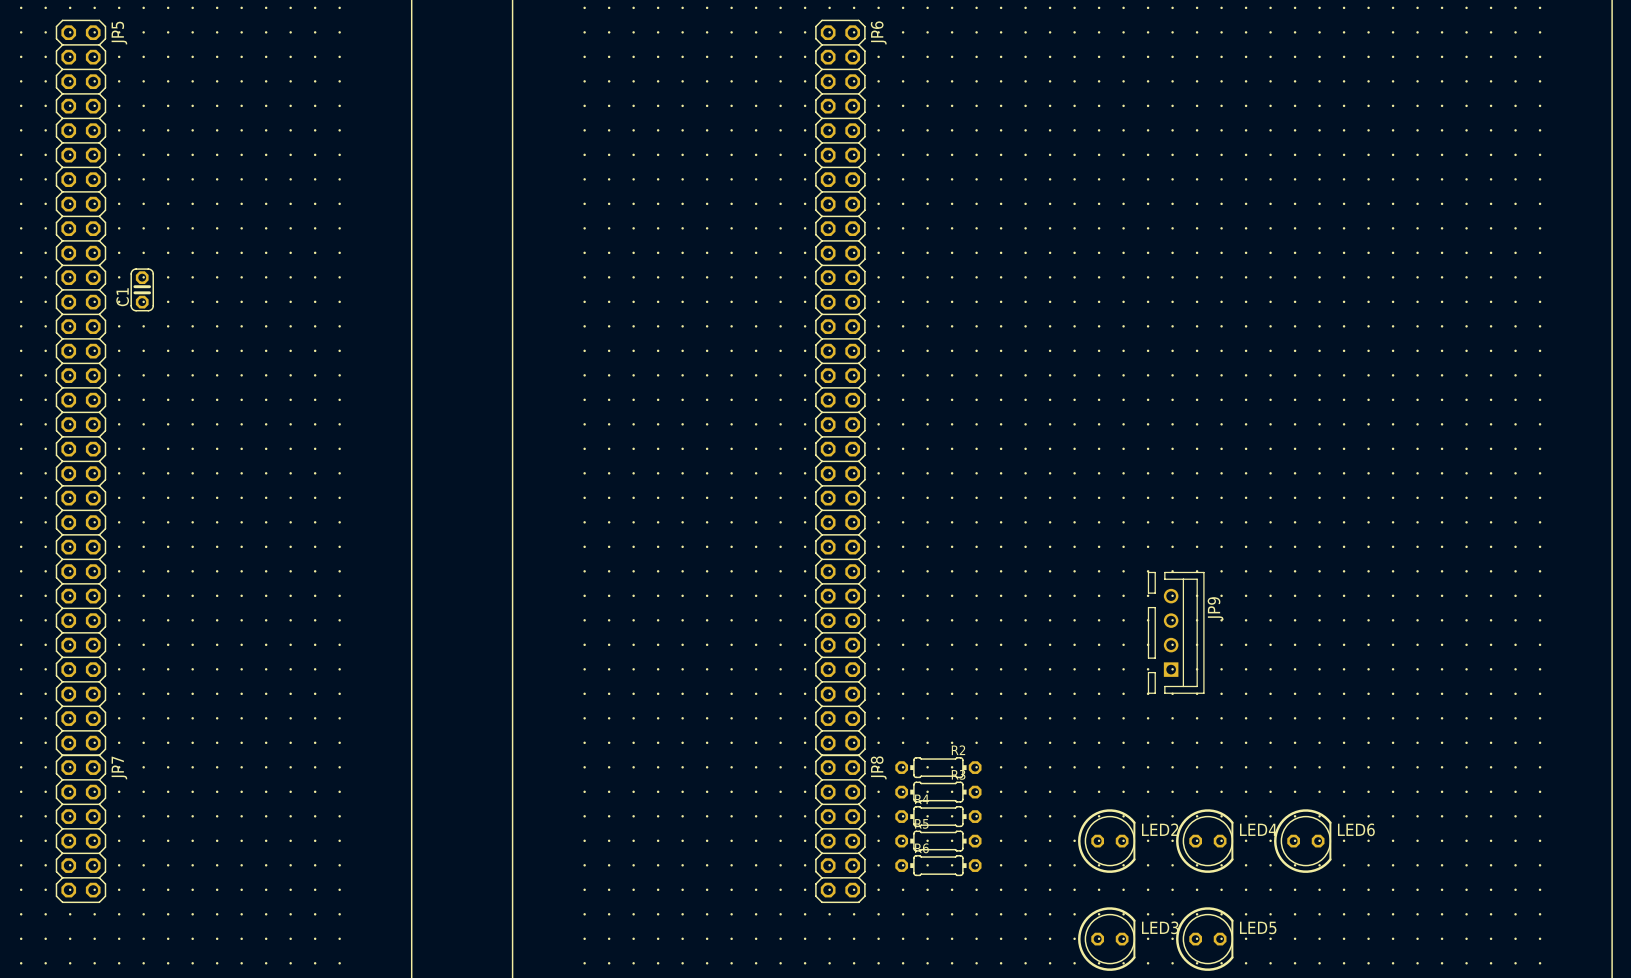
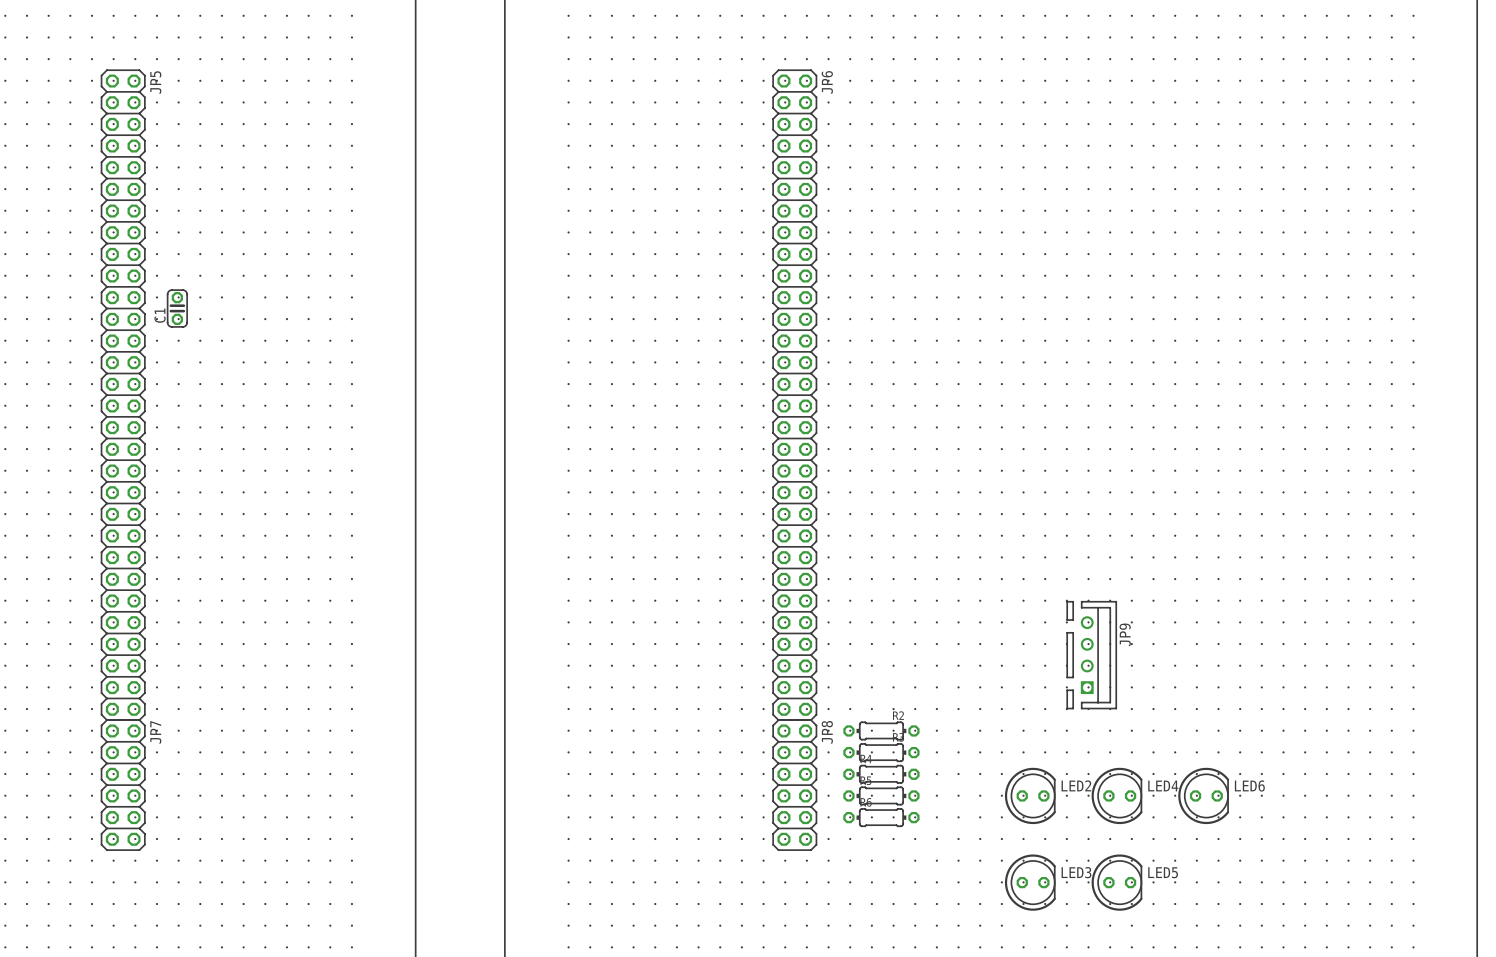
JP9 position: (1176, 632) -> (1091, 655)

